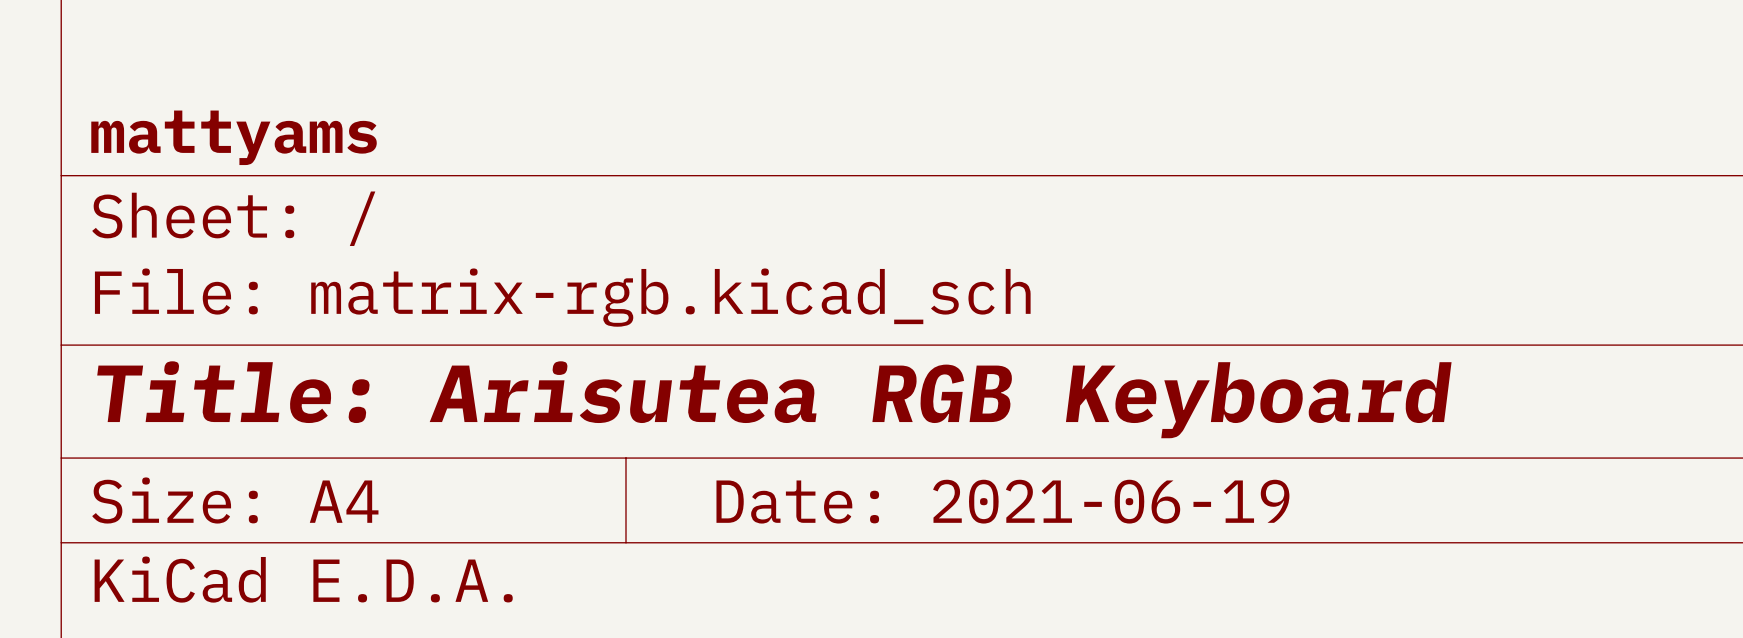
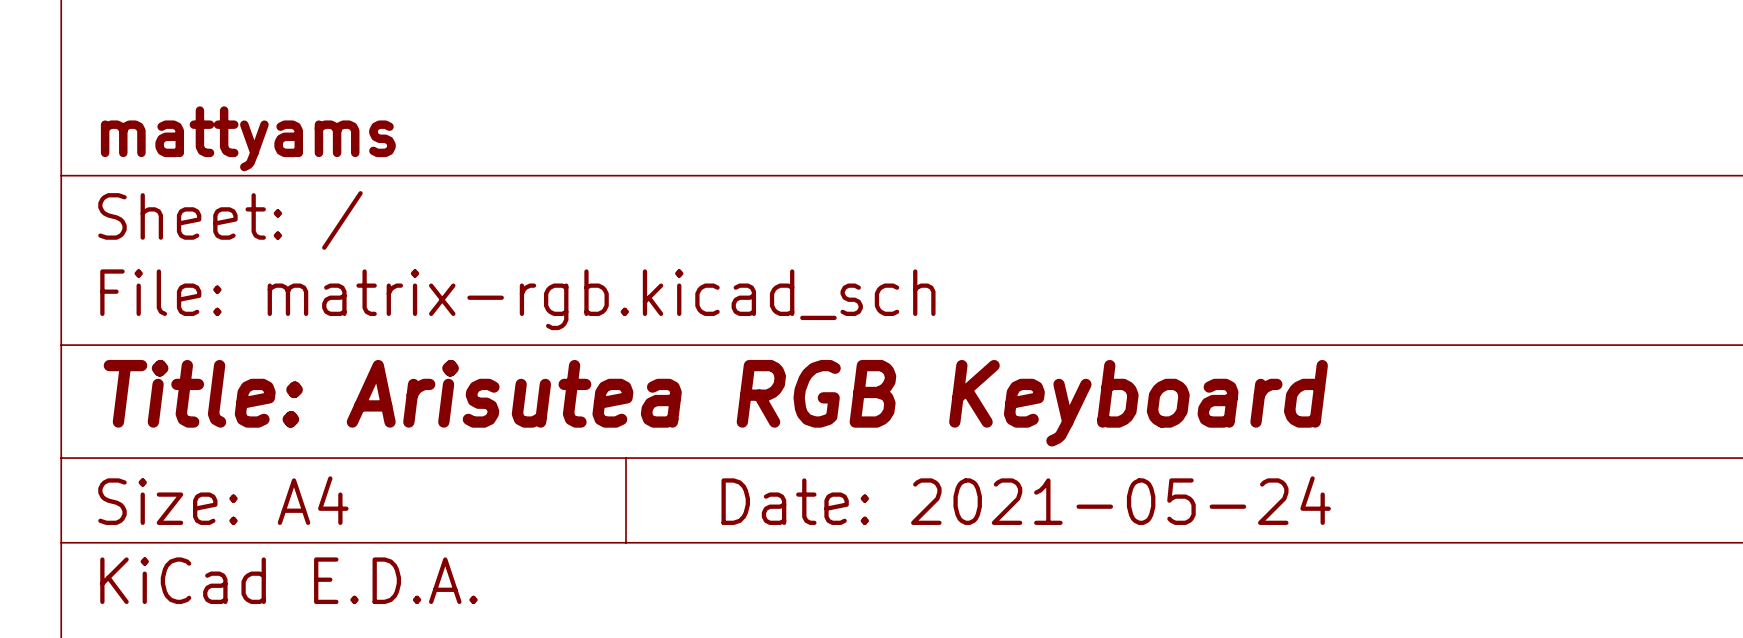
title block: Date: 2021-06-19 (1002, 501) -> Date: 2021-05-24 (1026, 500)

